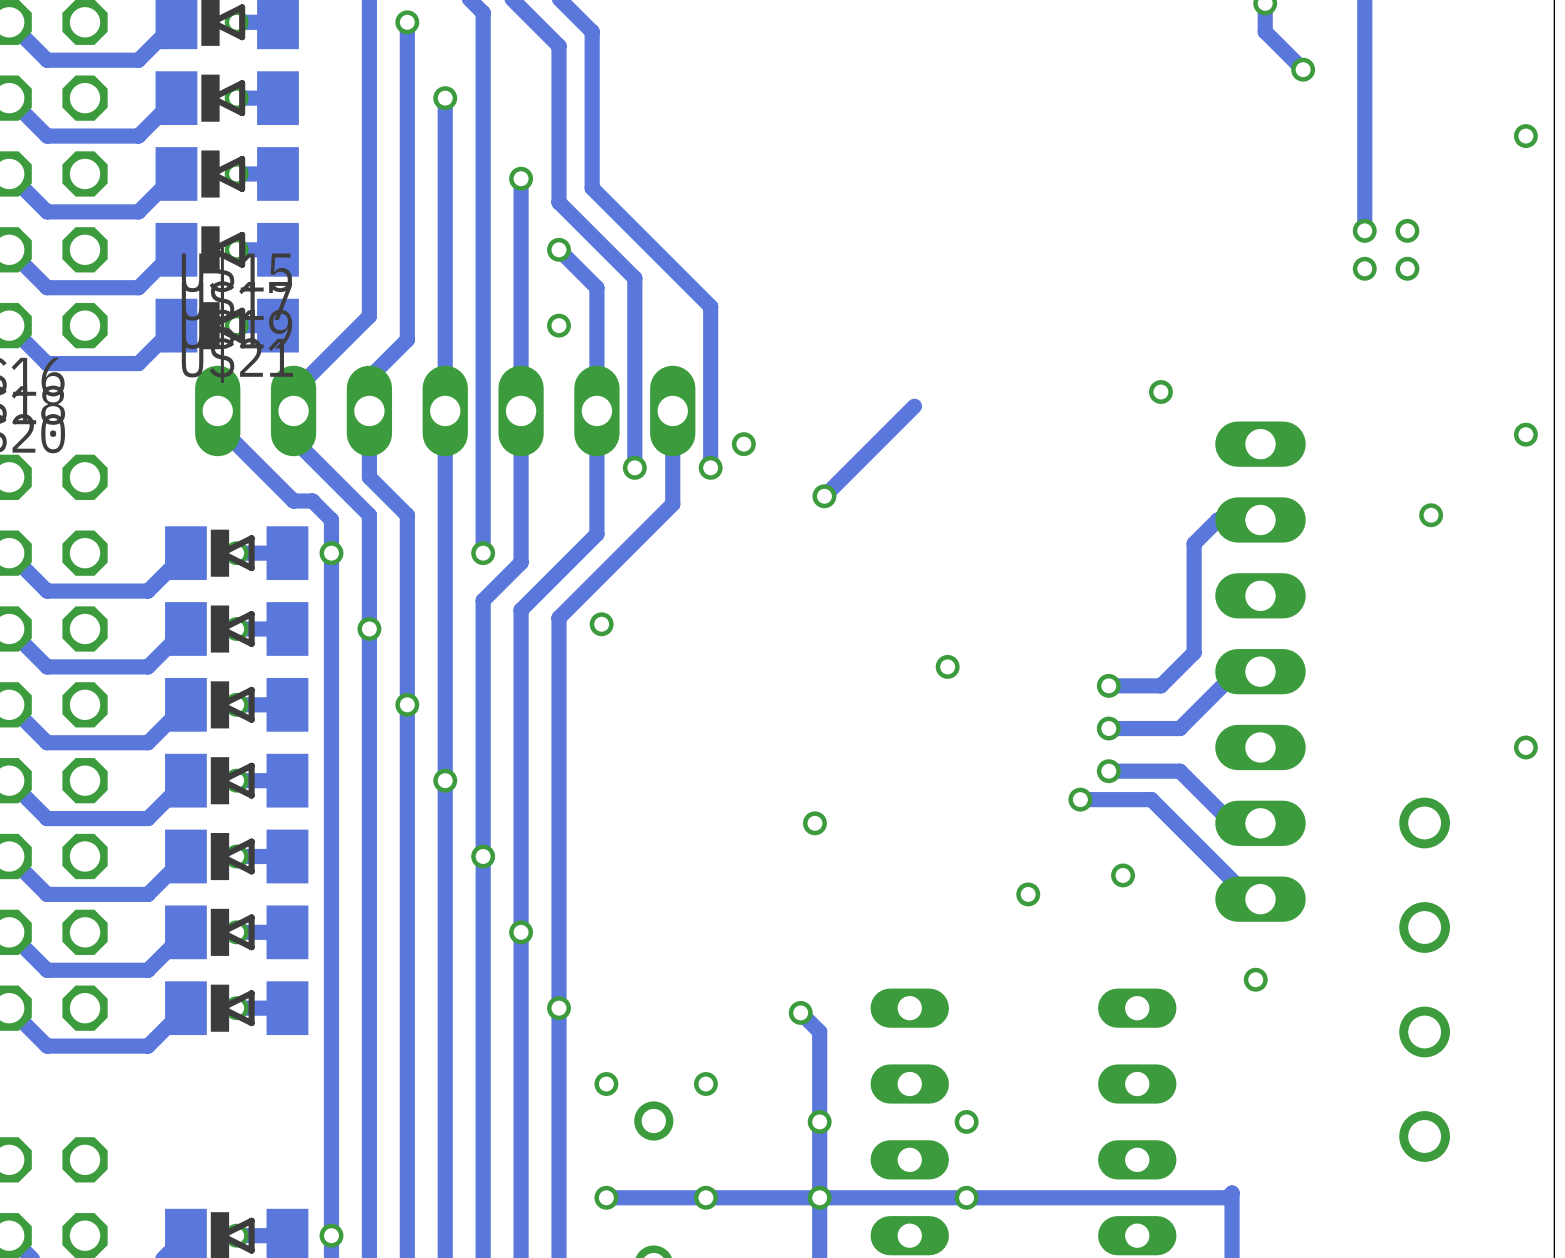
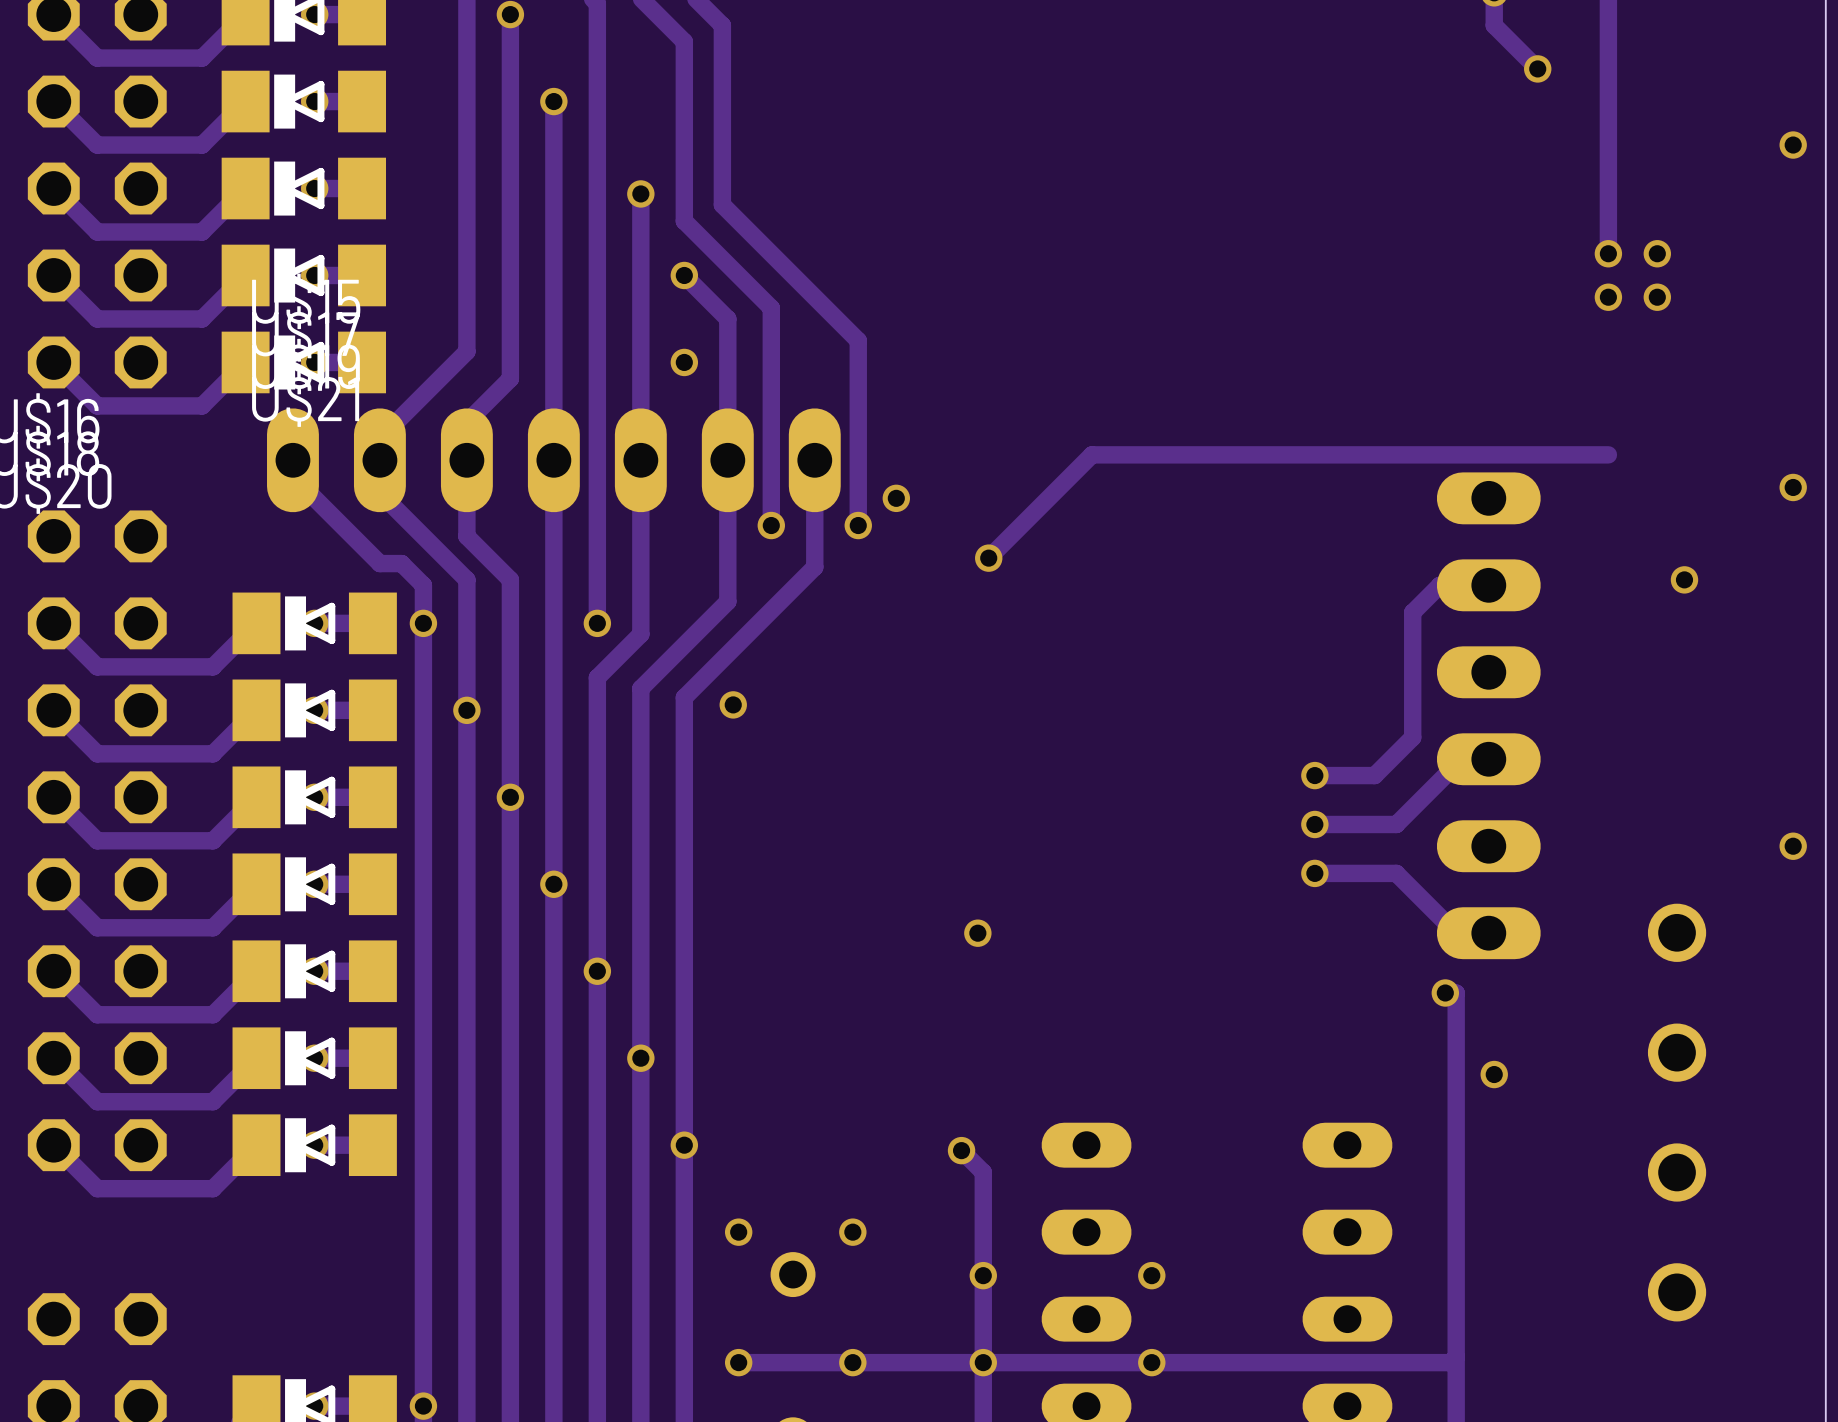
via: (1160, 392) -> none
track: none -> (1608, 454) (1092, 454)
via: (947, 666) -> none
part: (1260, 671) -> none
track: (1080, 799) (1151, 799) (1251, 899) (1260, 899) -> none
via: (1080, 799) -> none
via: (1123, 875) -> none
track: none -> (1445, 993) (1456, 993) (1456, 1357)
via: none -> (1445, 992)
via: (1028, 894) -> none
via position: (1255, 979) -> (1494, 1074)

